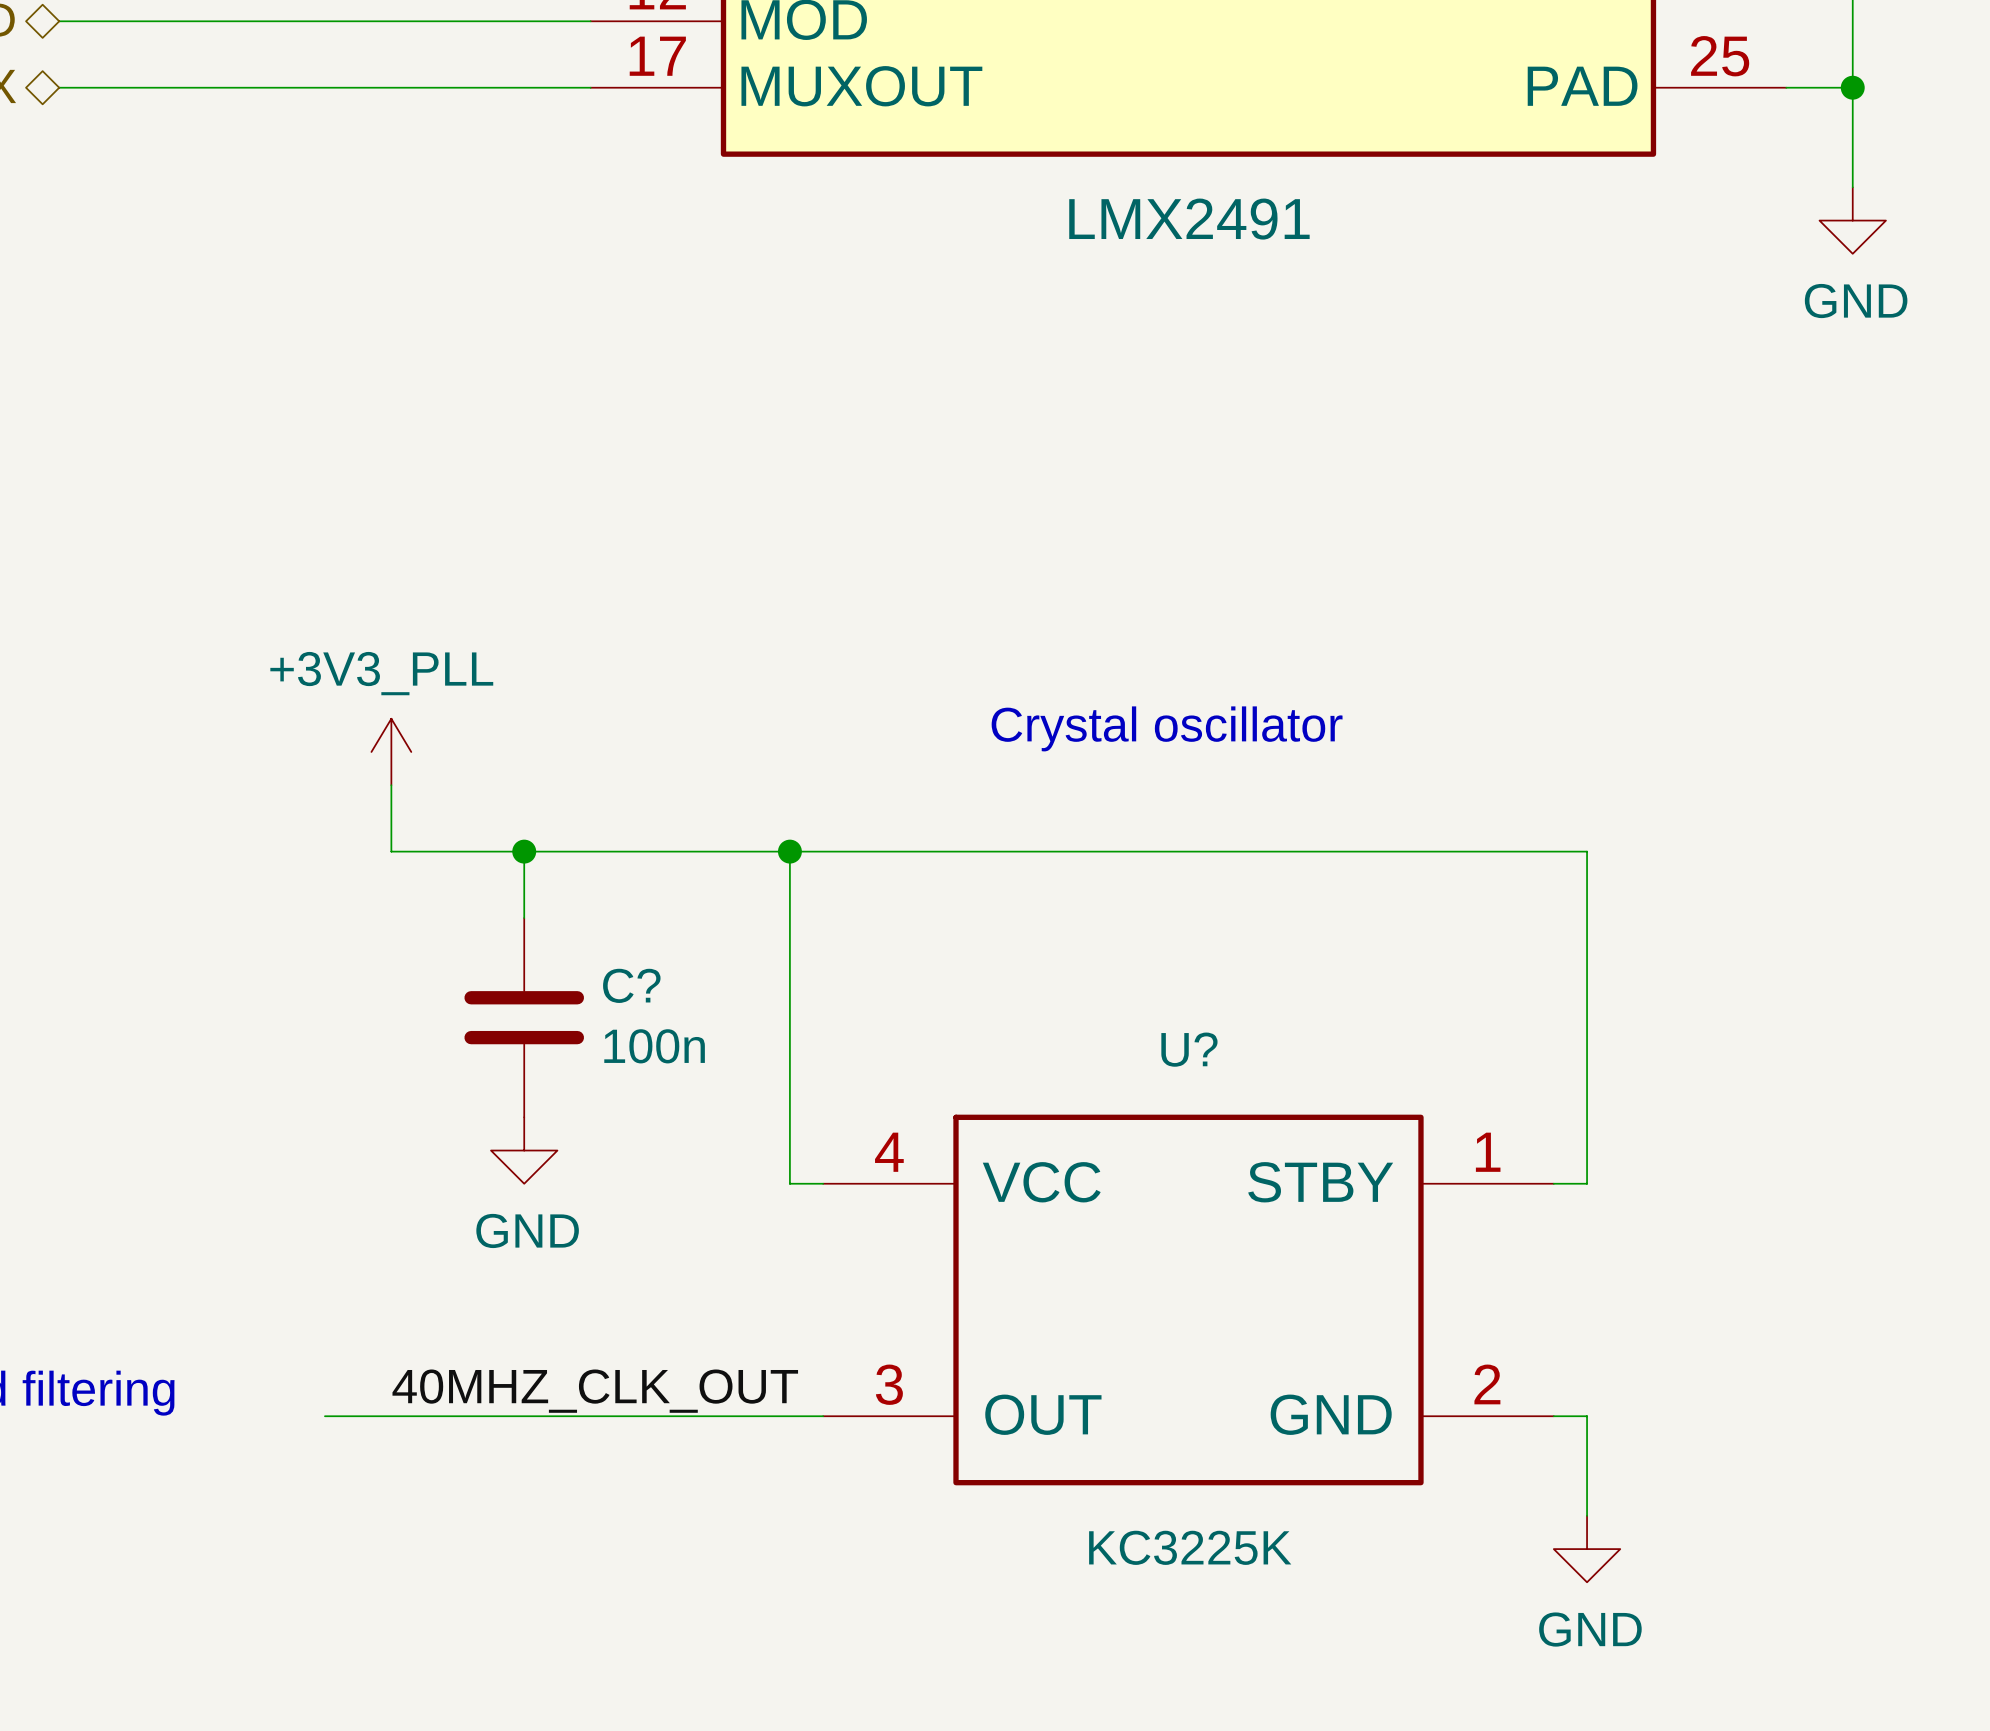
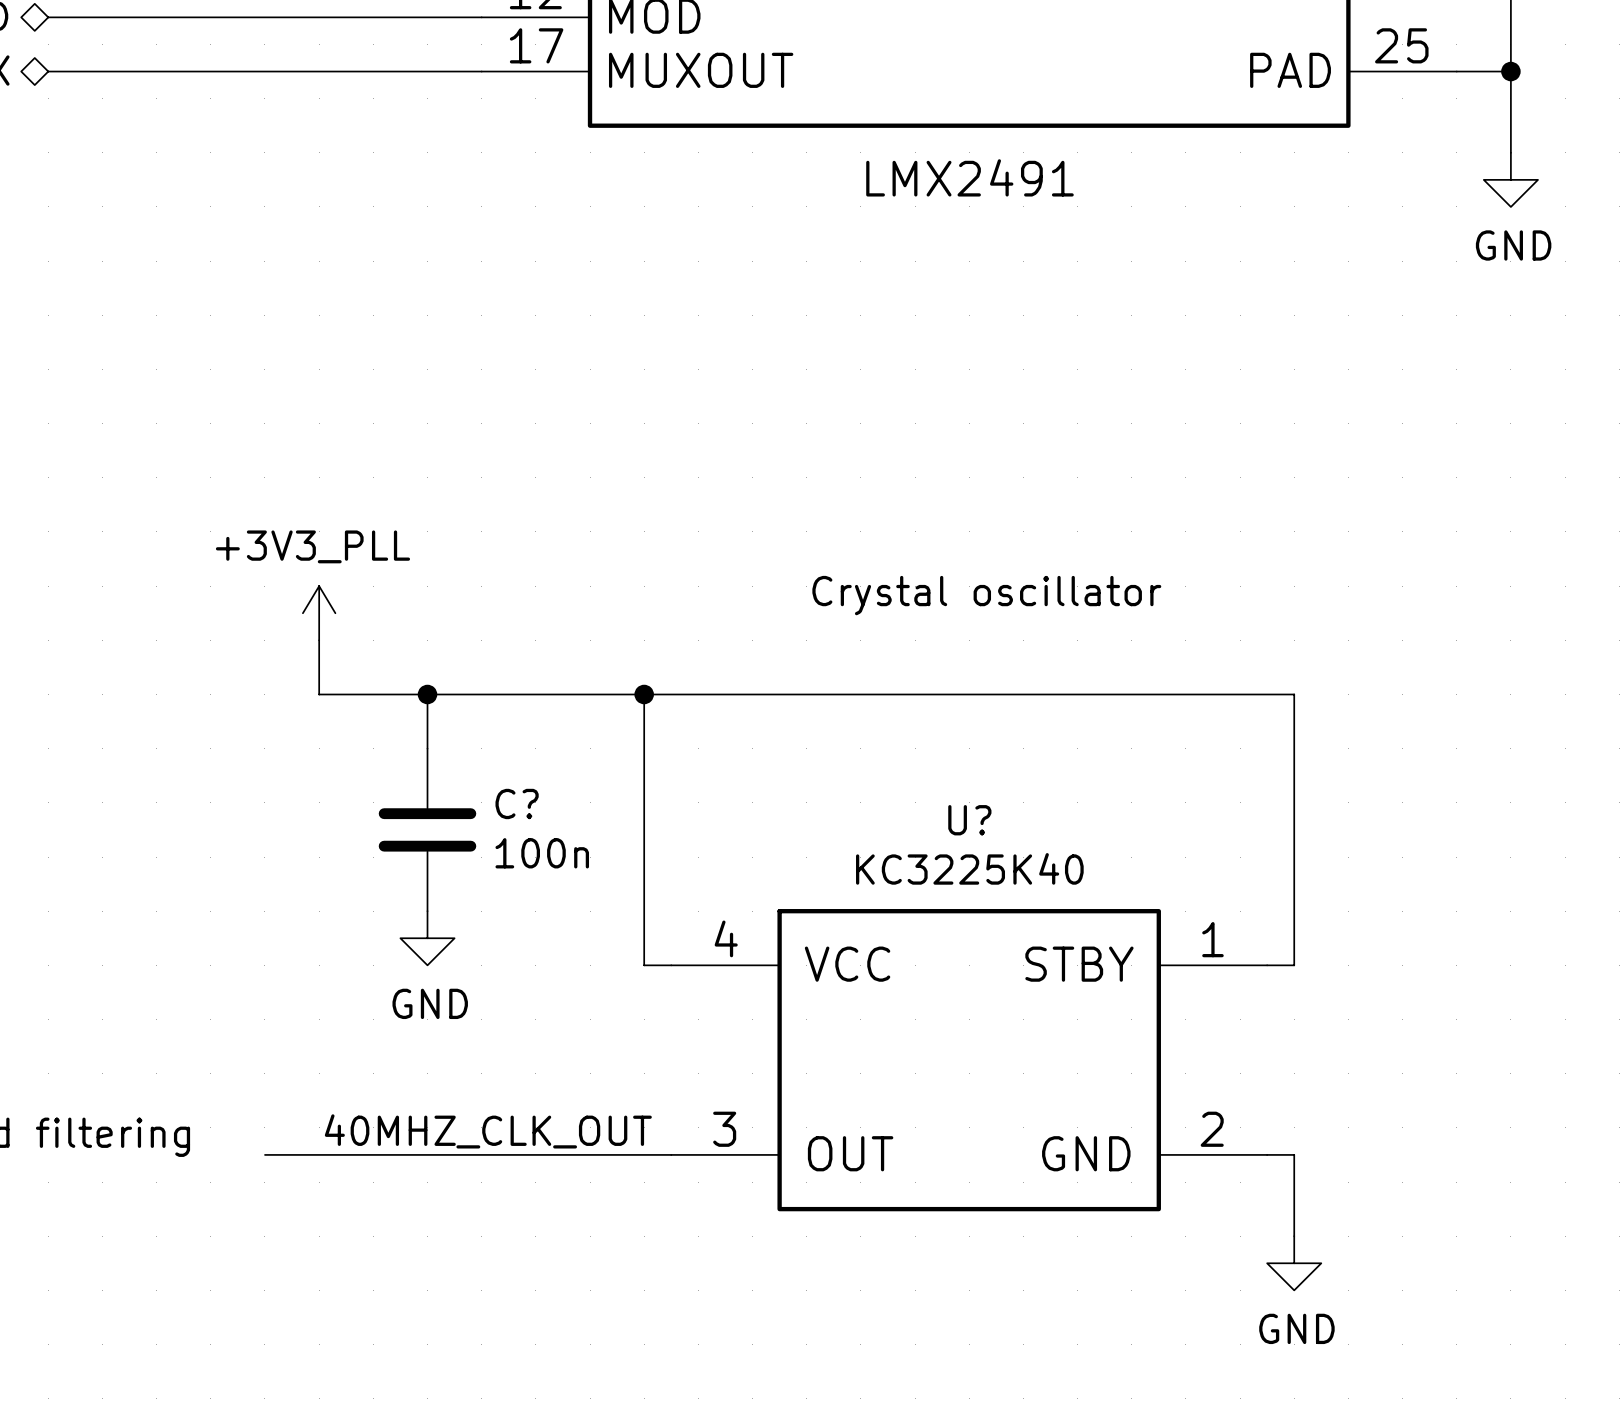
U? name position: U? (1189, 1049) -> U? (969, 820)
U? value: KC3225K (1190, 1547) -> KC3225K40 (969, 868)

